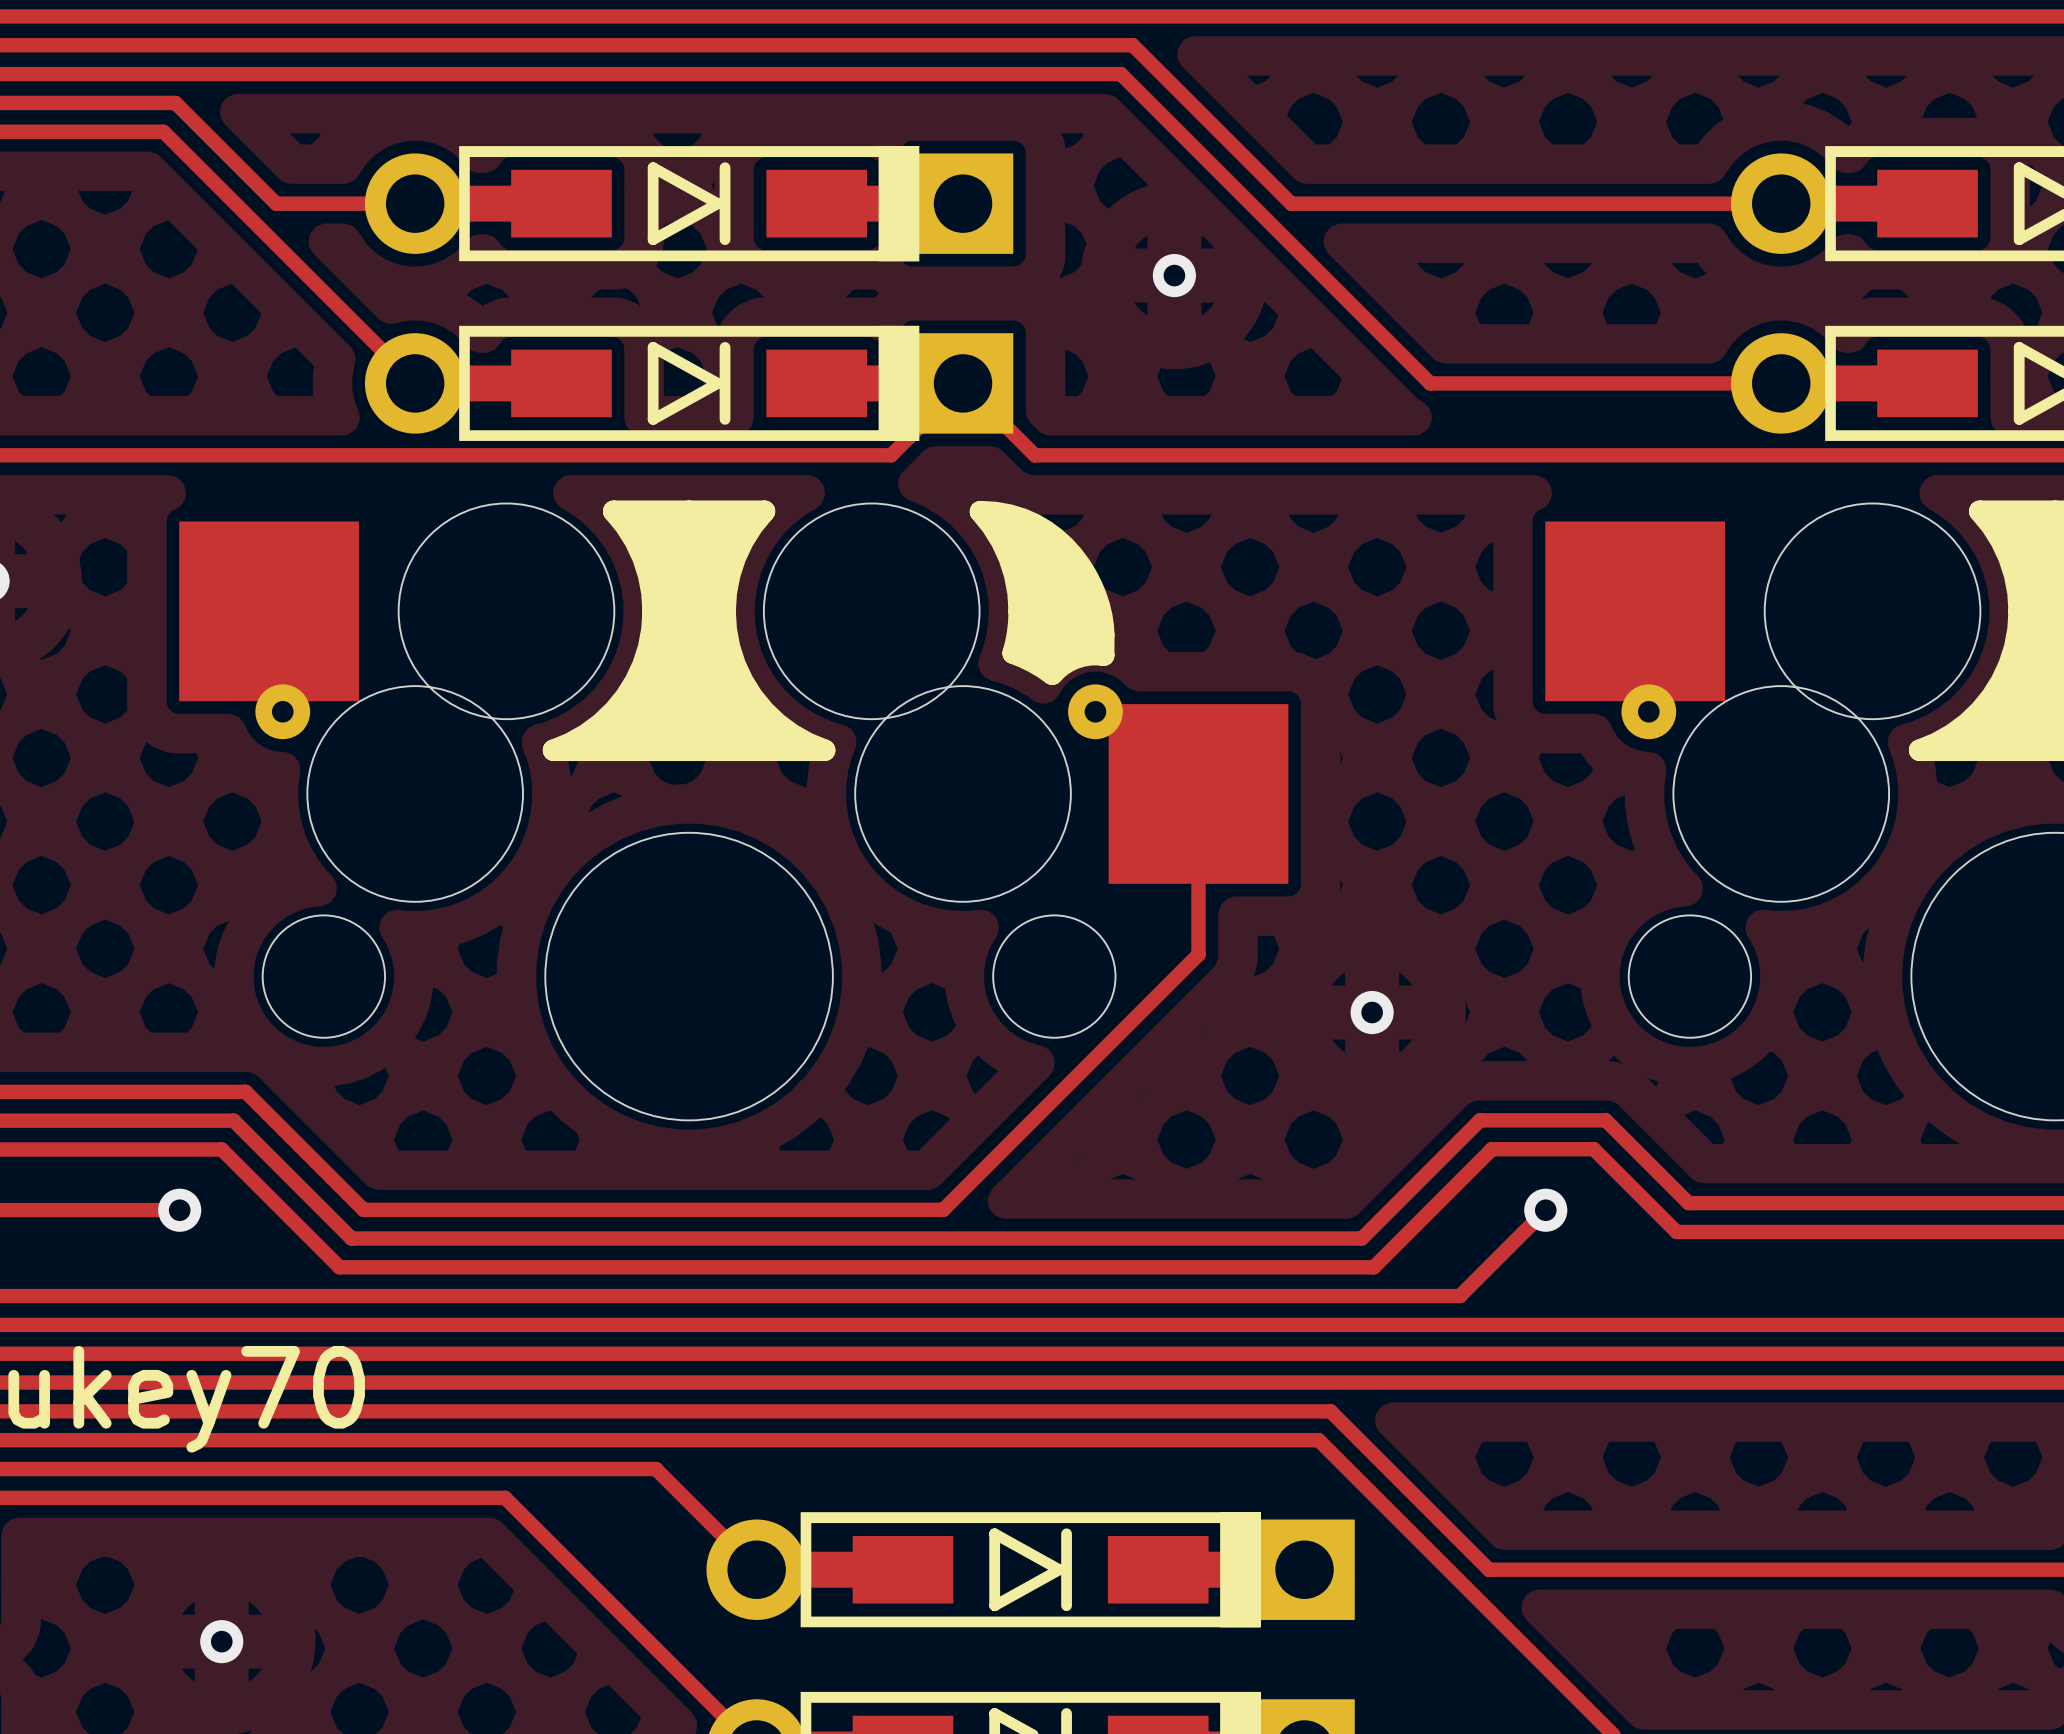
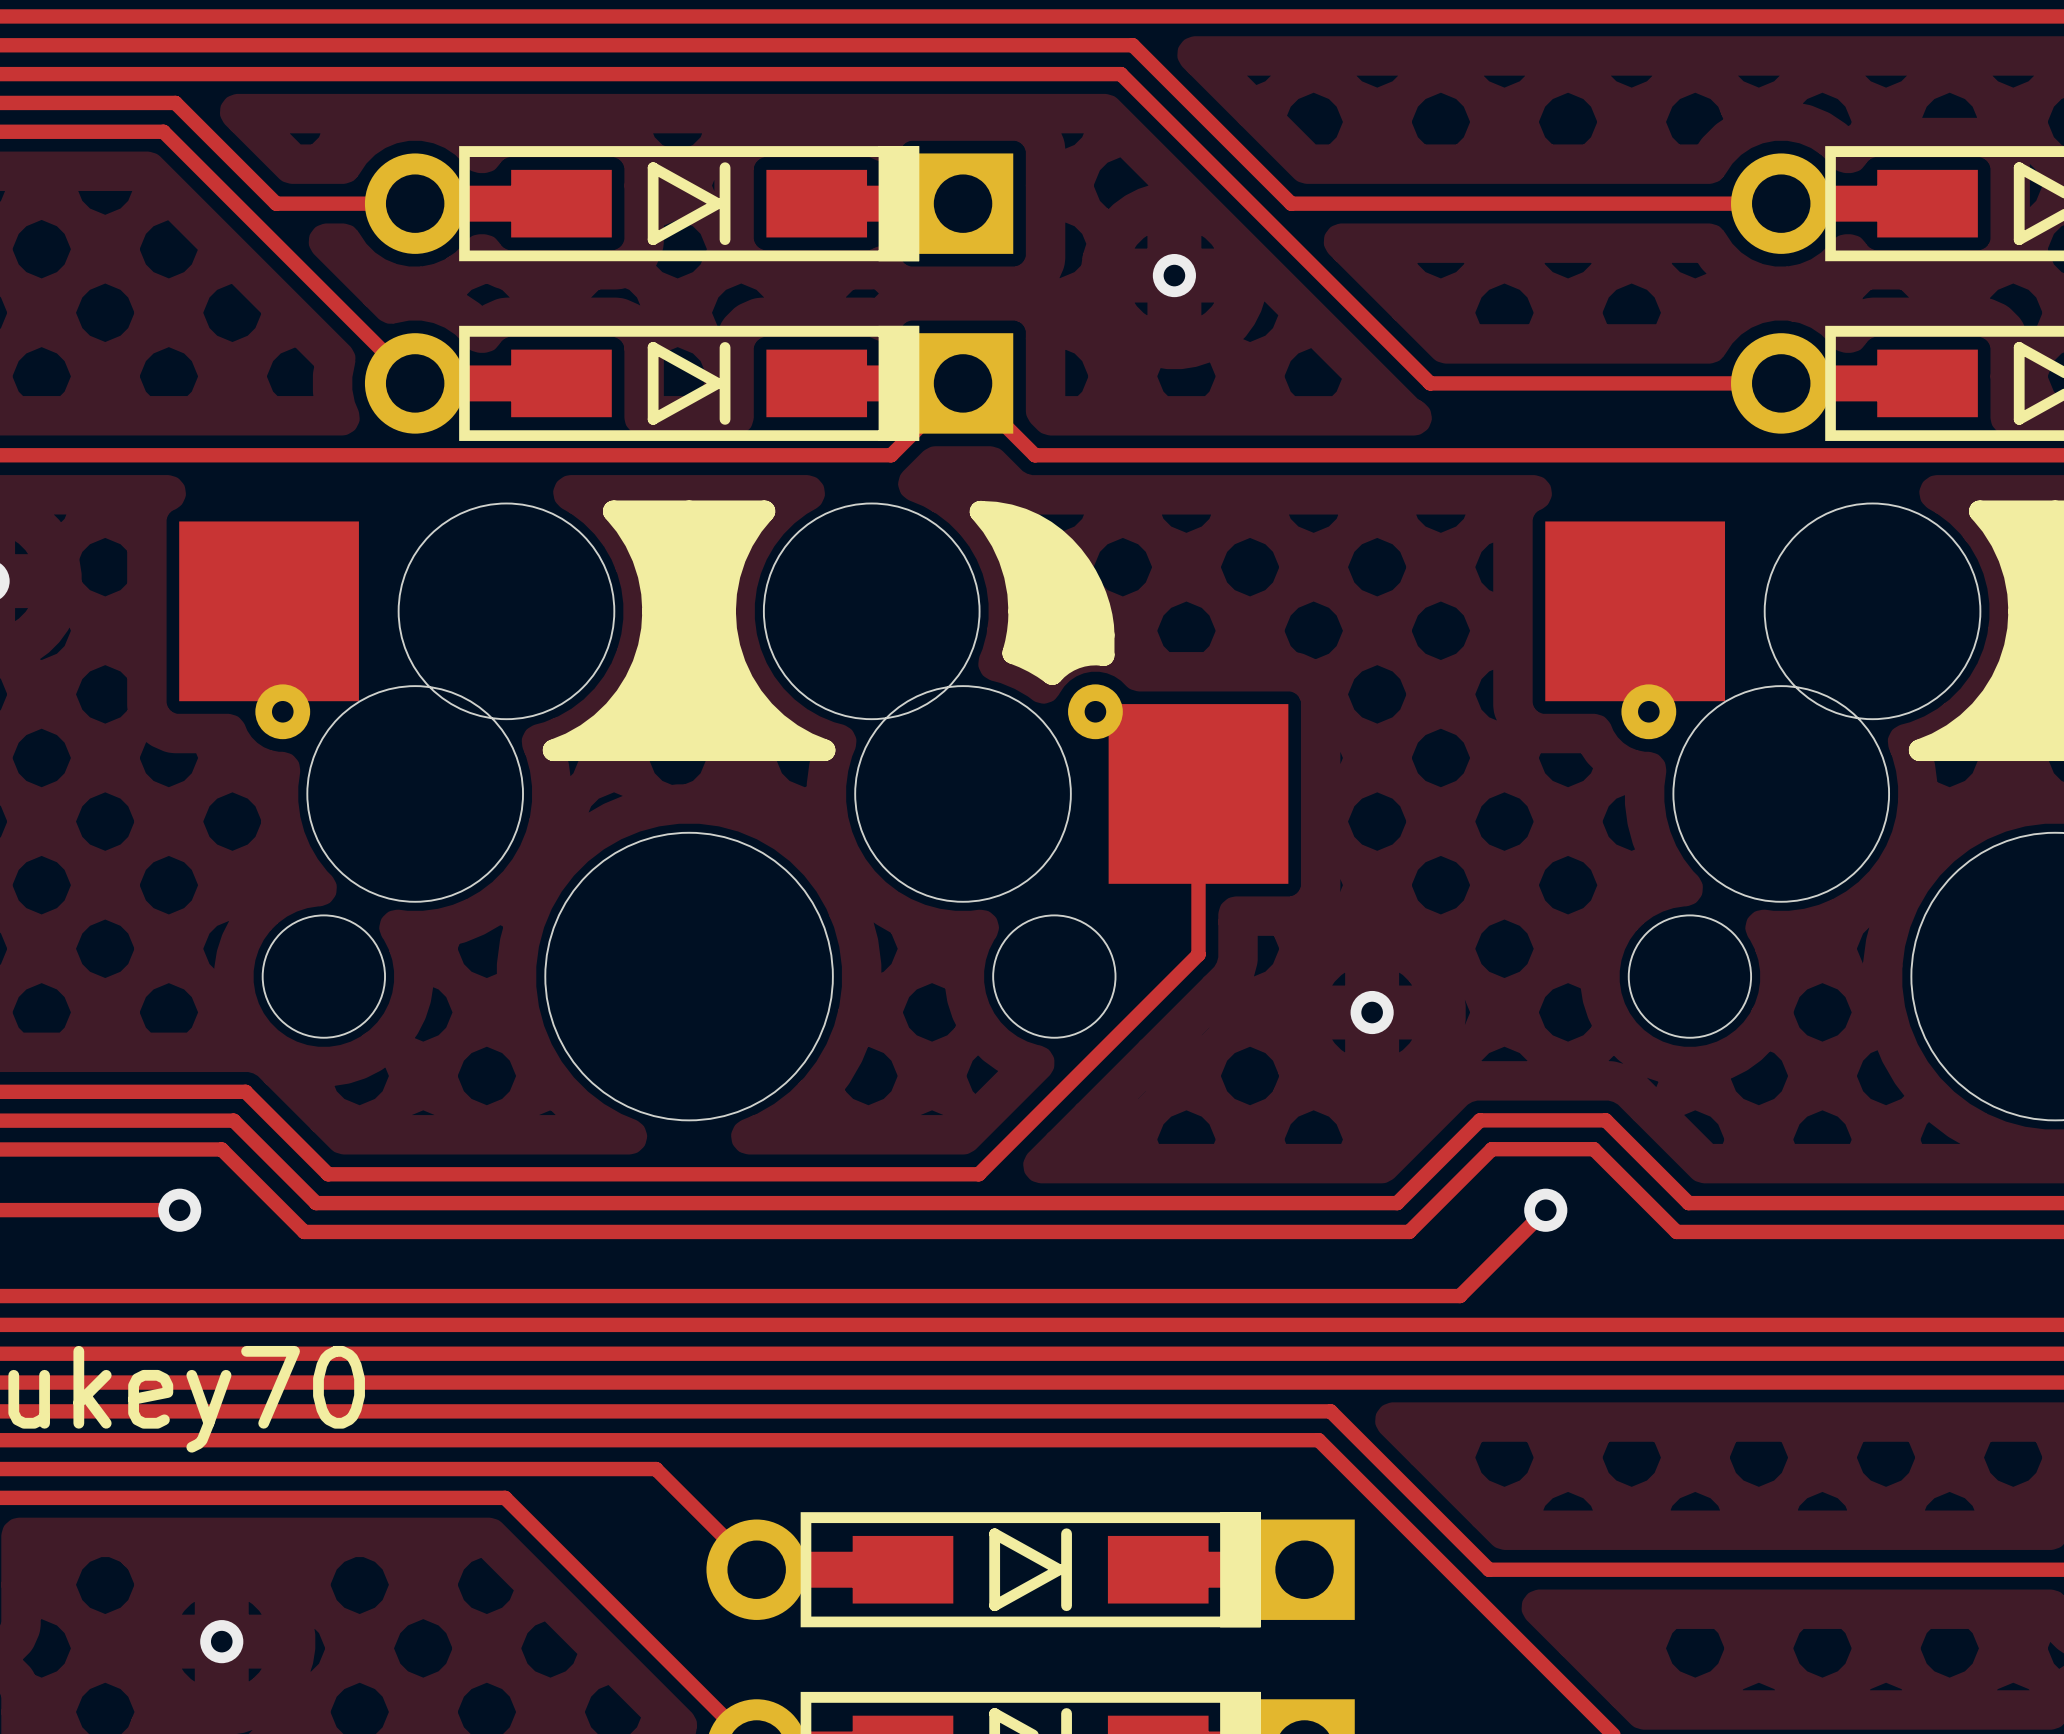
track: (328, 1174) (363, 1209) (943, 1209) (978, 1174) -> (328, 1174) (978, 1174)
track: (316, 1203) (351, 1238) (1361, 1238) (1397, 1203) -> (316, 1203) (1397, 1203)
track: (304, 1231) (339, 1267) (1373, 1267) (1409, 1231) -> (304, 1231) (1409, 1231)

